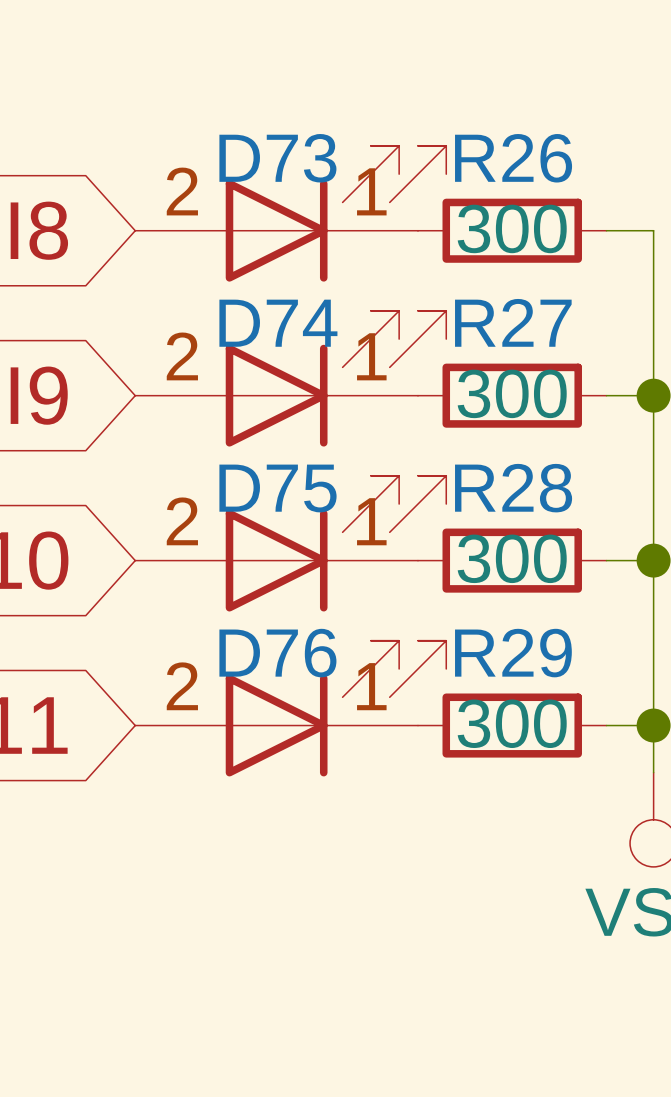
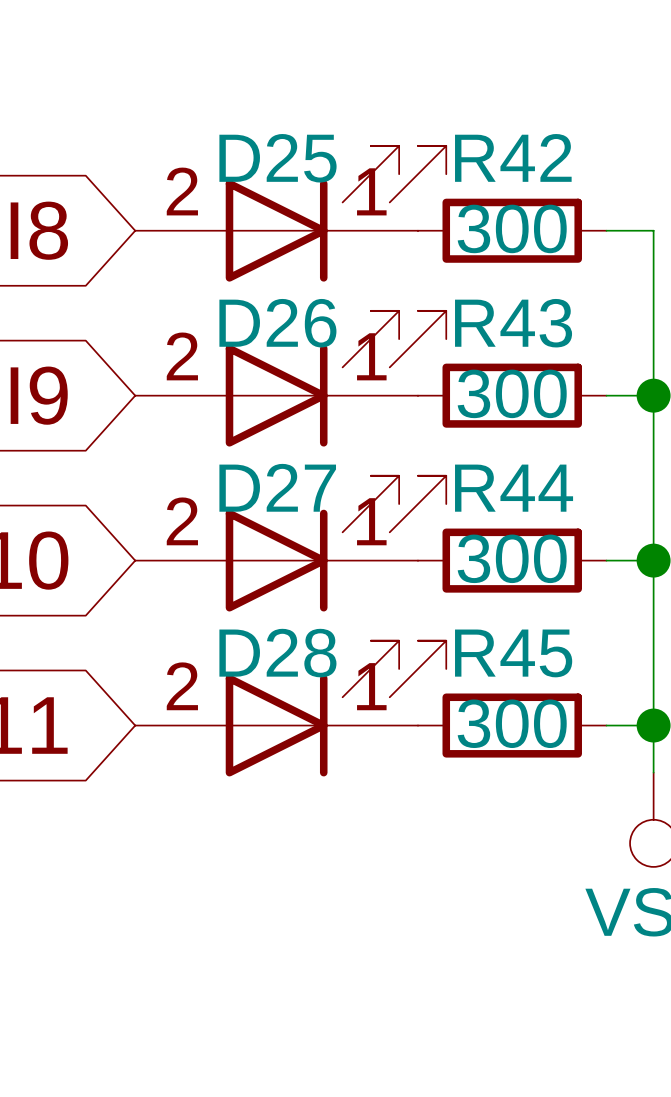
D73 name: D73 (277, 158) -> D25 (277, 158)
R26 name: R26 (513, 158) -> R42 (513, 157)
R27 name: R27 (513, 322) -> R43 (513, 323)
D74 name: D74 (278, 323) -> D26 (277, 323)
D75 name: D75 (277, 488) -> D27 (277, 487)
R28 name: R28 (513, 488) -> R44 (514, 488)
D76 name: D76 (277, 653) -> D28 (277, 653)
R29 name: R29 (513, 653) -> R45 (513, 653)

